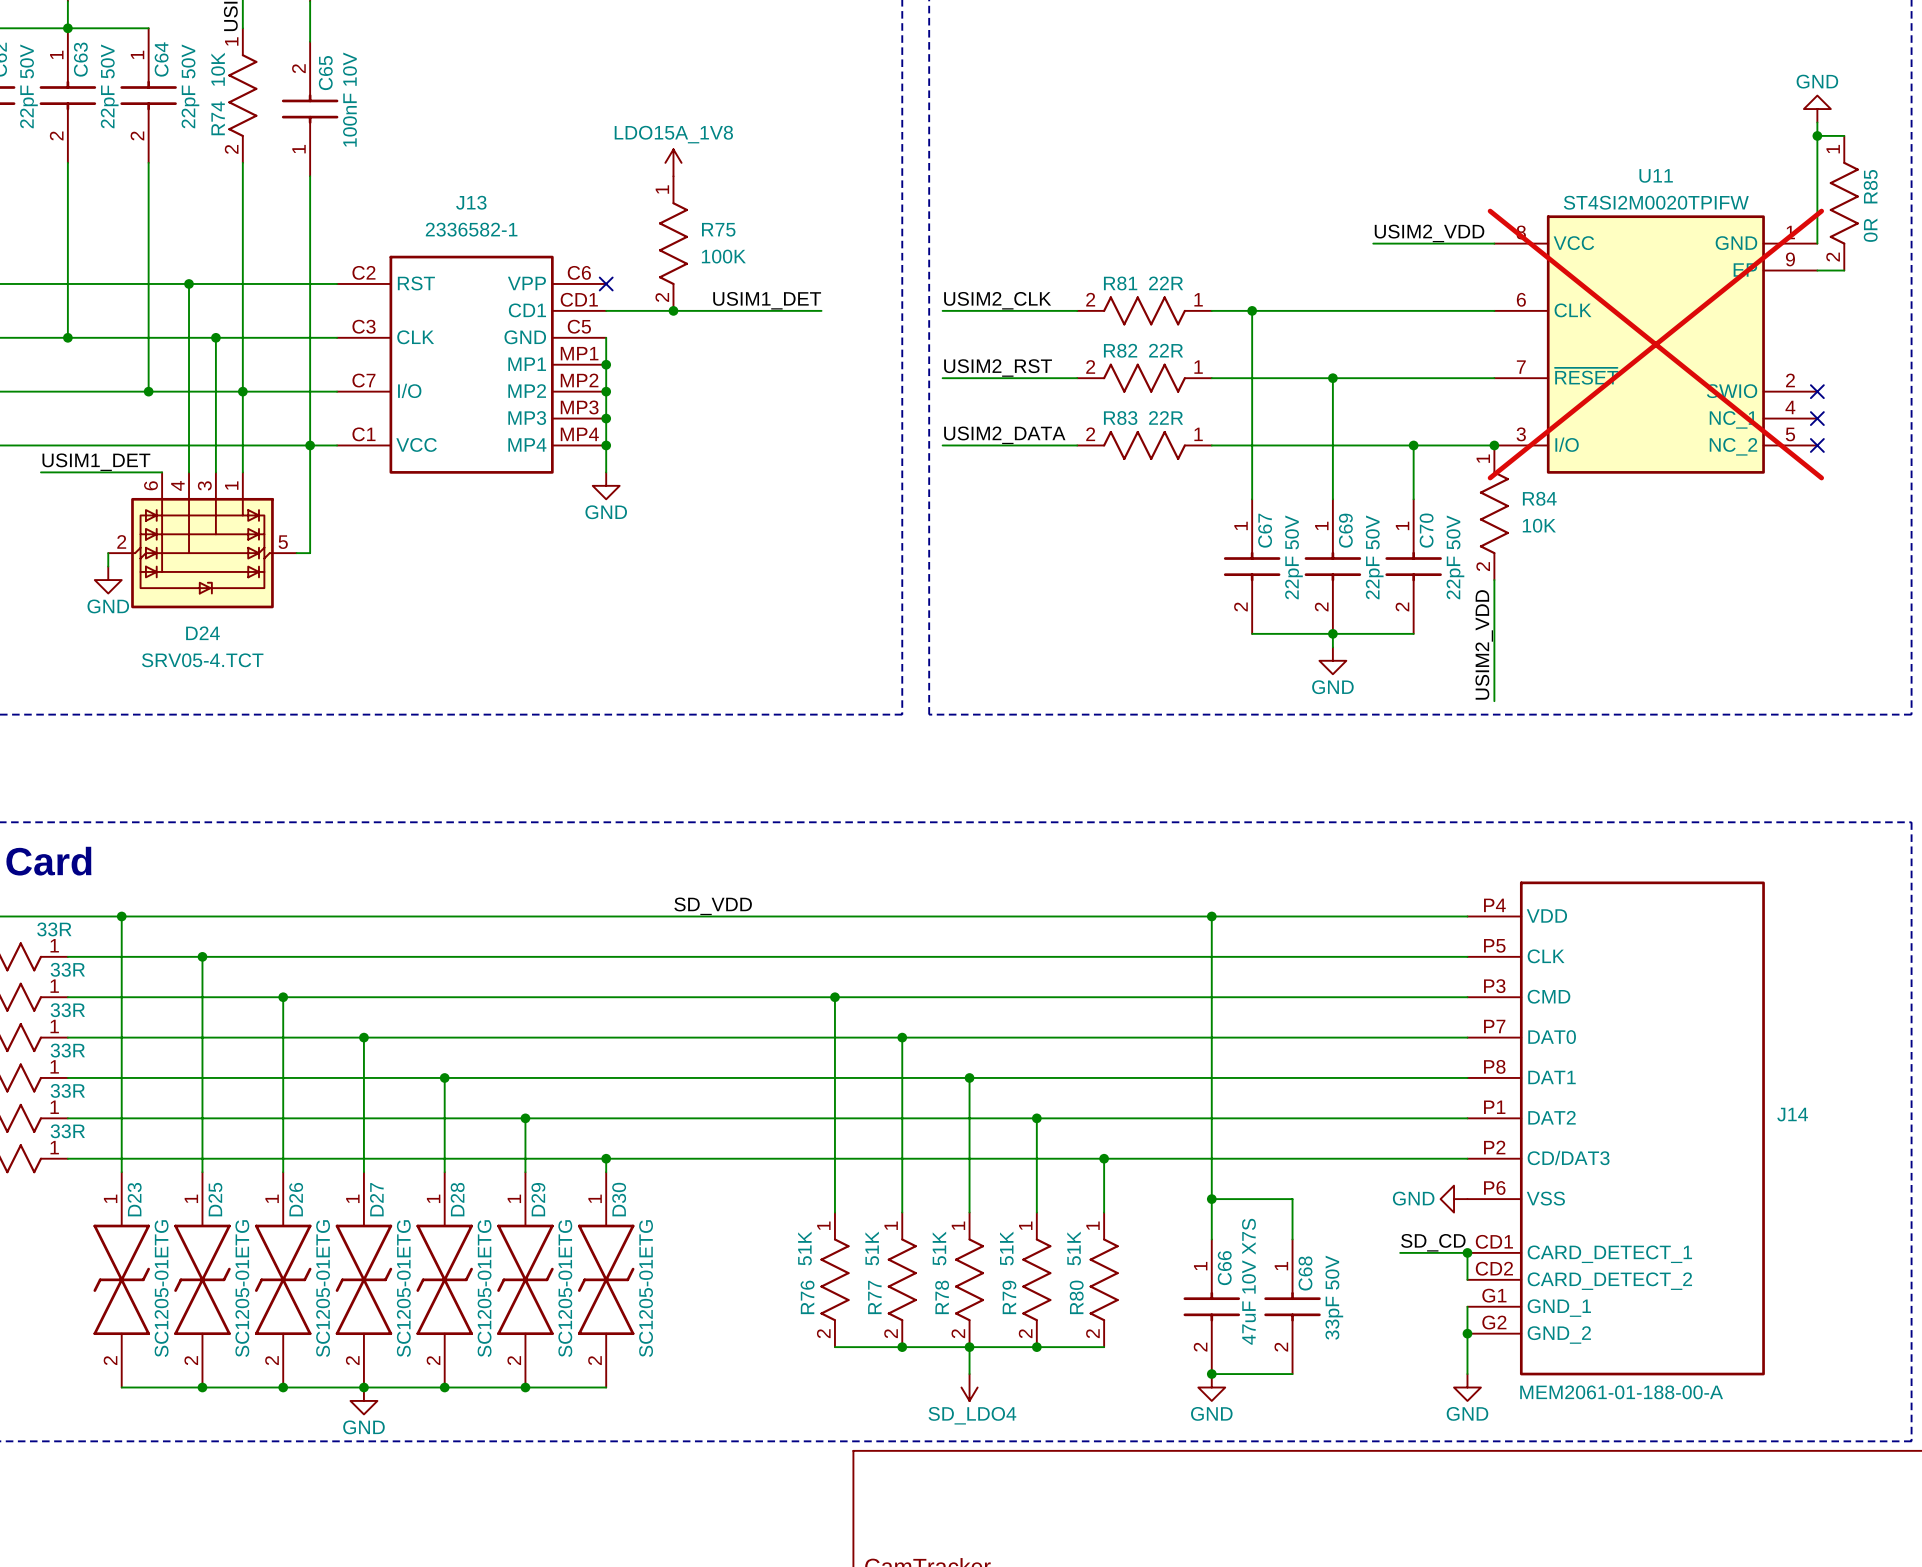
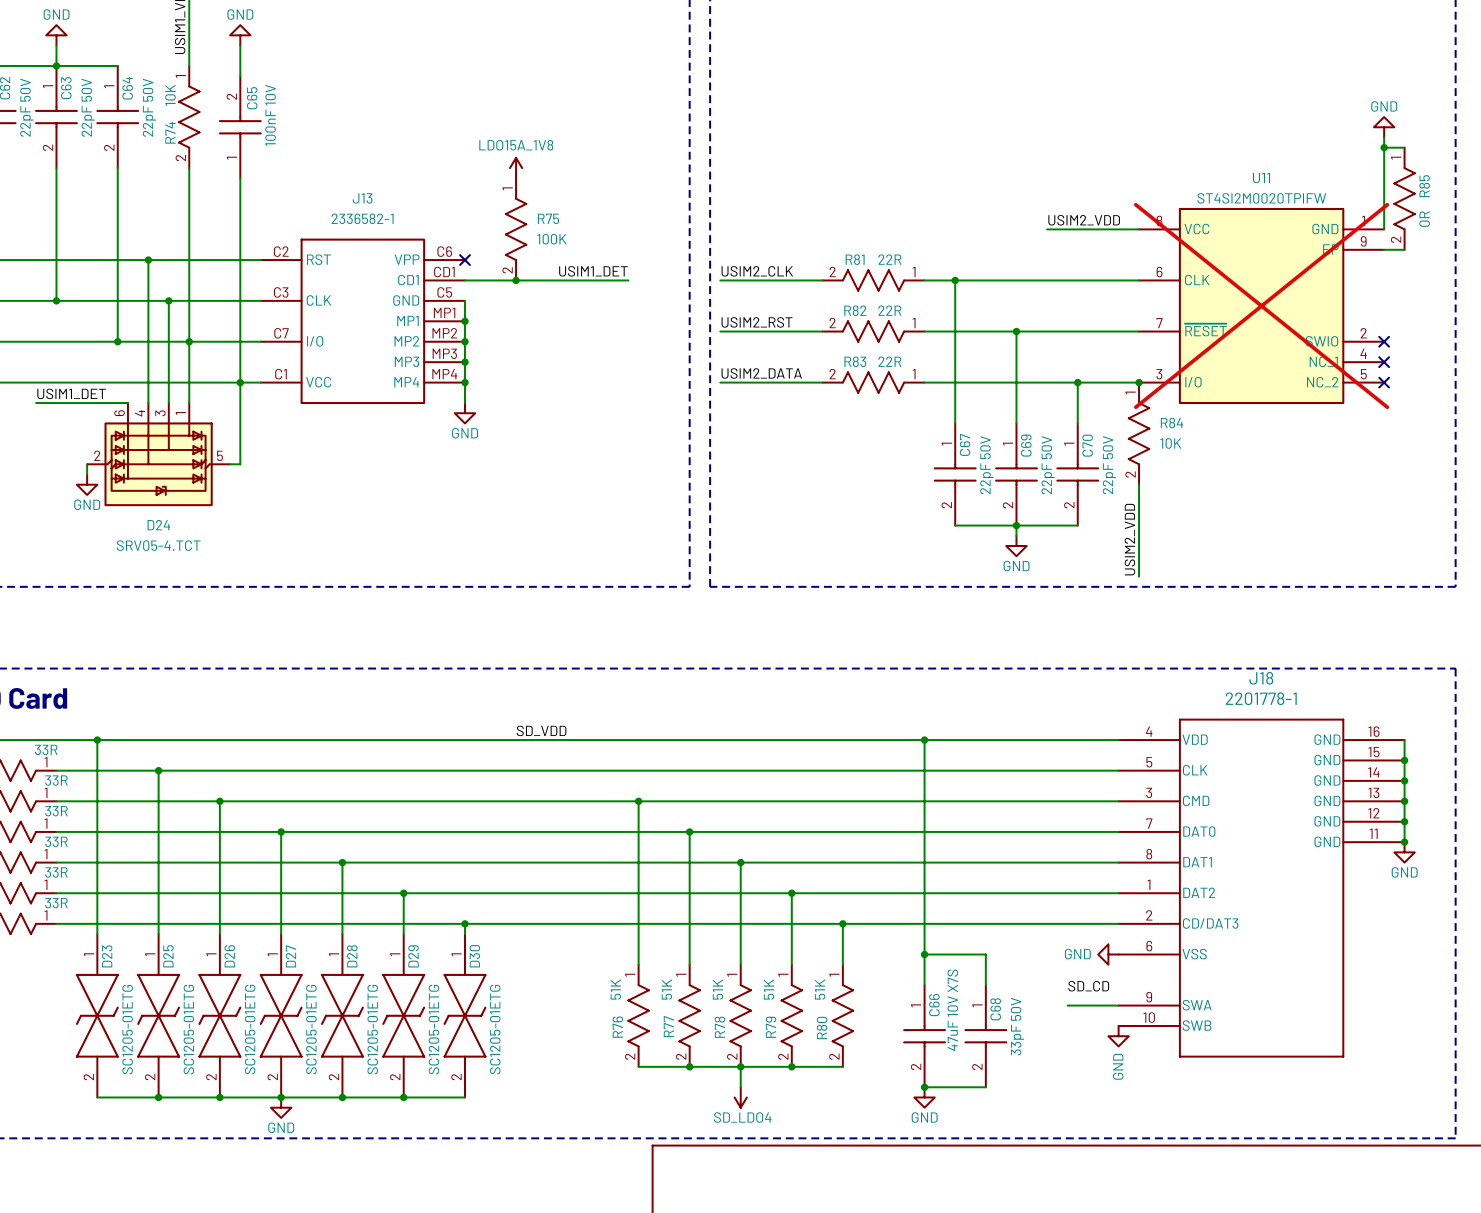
wire: none -> (1404, 740) (1404, 842)
junction: none -> (1404, 760)
junction: none -> (1404, 780)
junction: none -> (1404, 801)
junction: none -> (1404, 821)
junction: none -> (1404, 842)
power symbol: none -> GND (1404, 852)
J18: none -> 2201778-1 (1261, 888)
J14: MEM2061-01-188-00-A (1616, 1128) -> none
wire: (1400, 1252) (1467, 1252) (1467, 1279) -> none
junction: (1467, 1252) -> none
wire: none -> (1067, 1005) (1118, 1005)
wire: (1467, 1306) (1467, 1374) -> none
junction: (1467, 1333) -> none
power symbol position: GND (1467, 1387) -> GND (1118, 1036)
power symbol text rotation: 0° (1467, 1413) -> 90° counterclockwise (1118, 1066)

